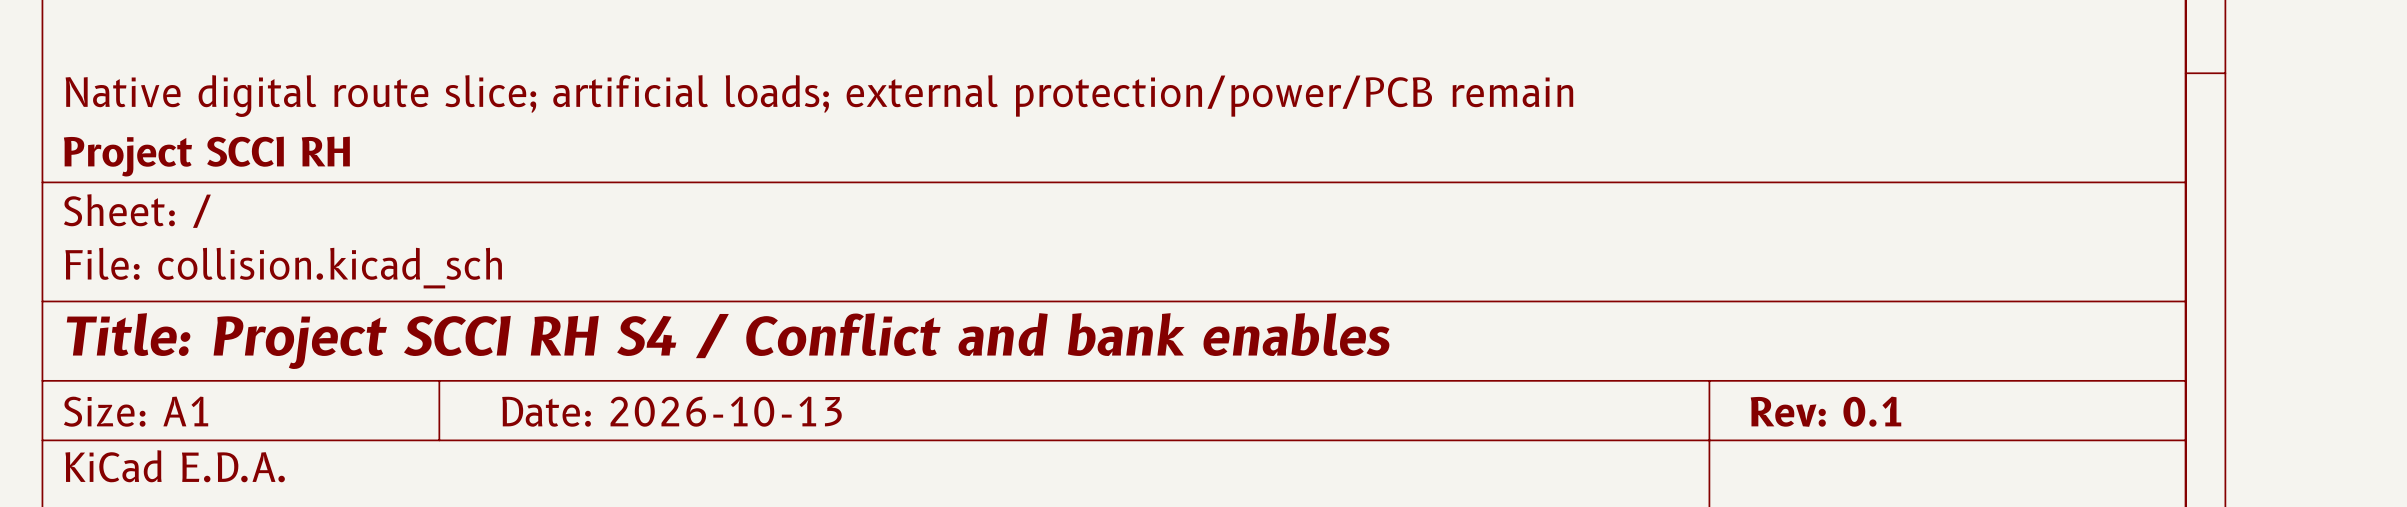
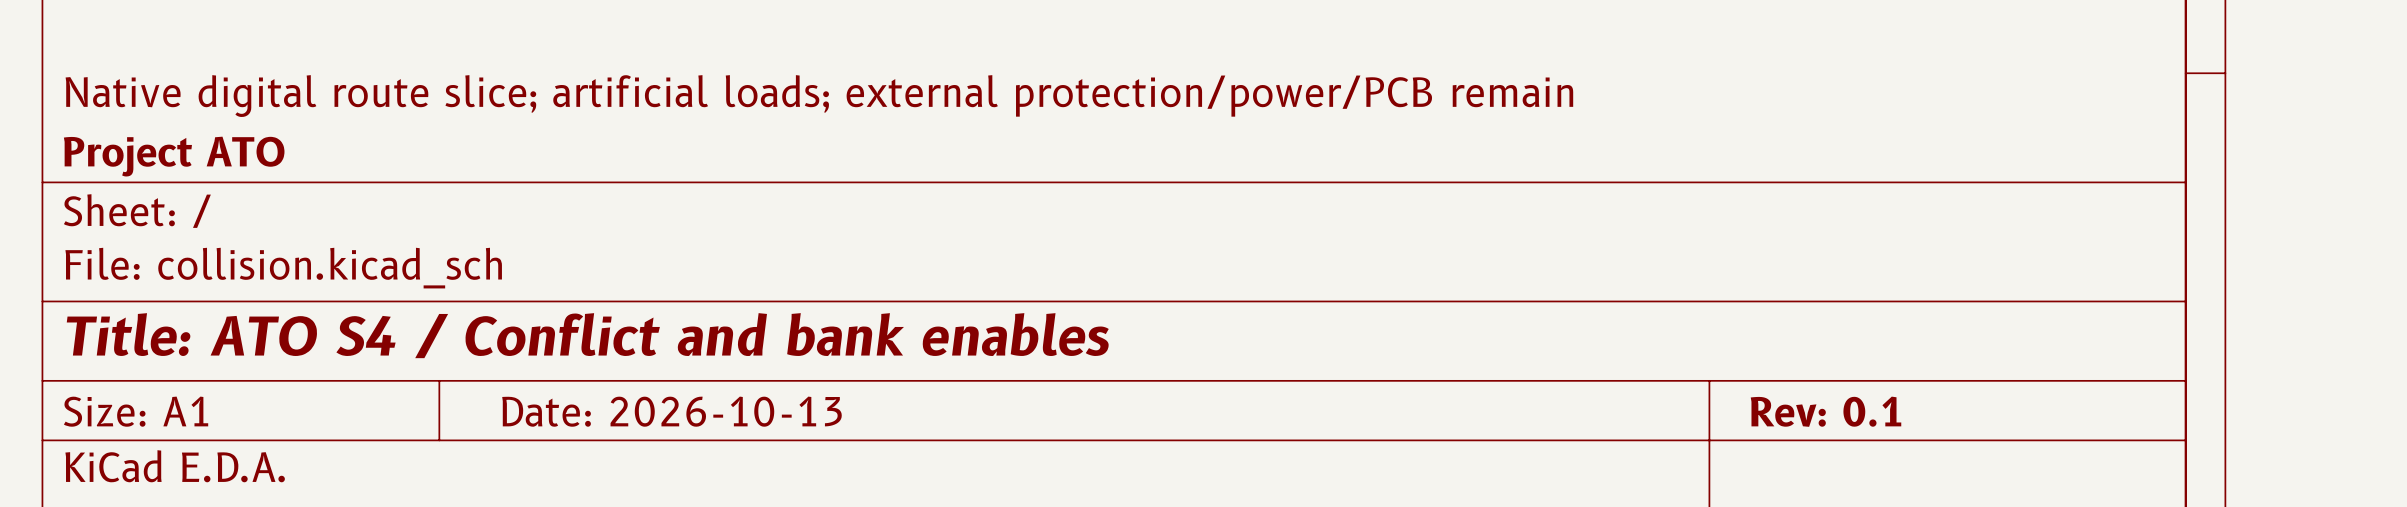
title block: Project SCCI RH (206, 156) -> Project ATO (174, 156)
title block: Title: Project SCCI RH S4 / Conflict and bank enables (728, 341) -> Title: ATO S4 / Conflict and bank enables (587, 335)

